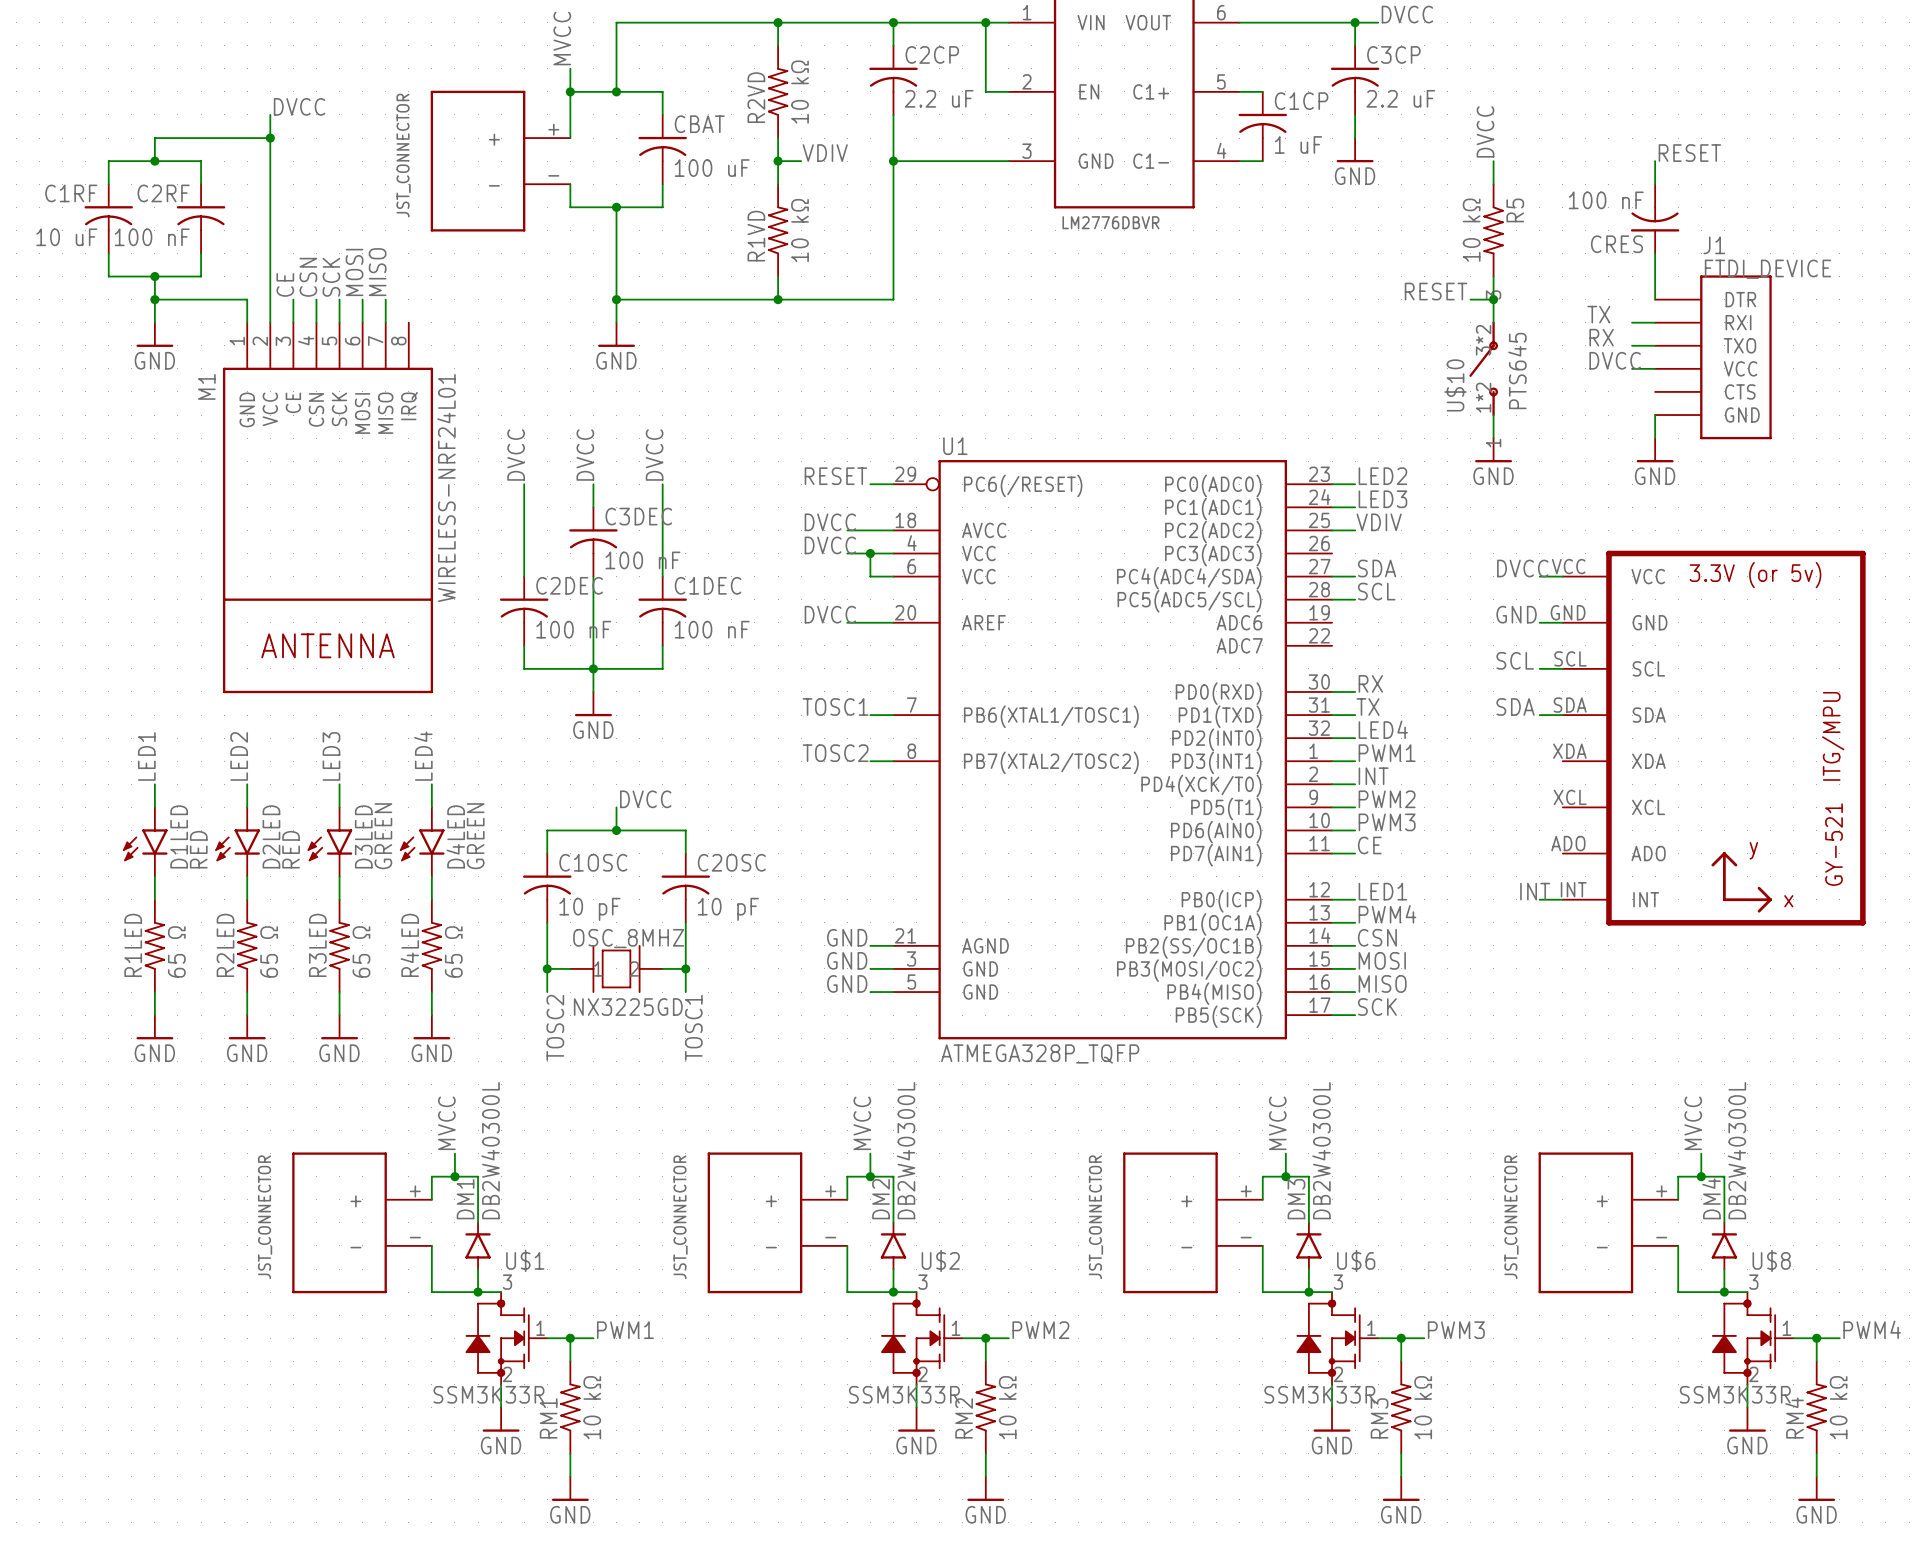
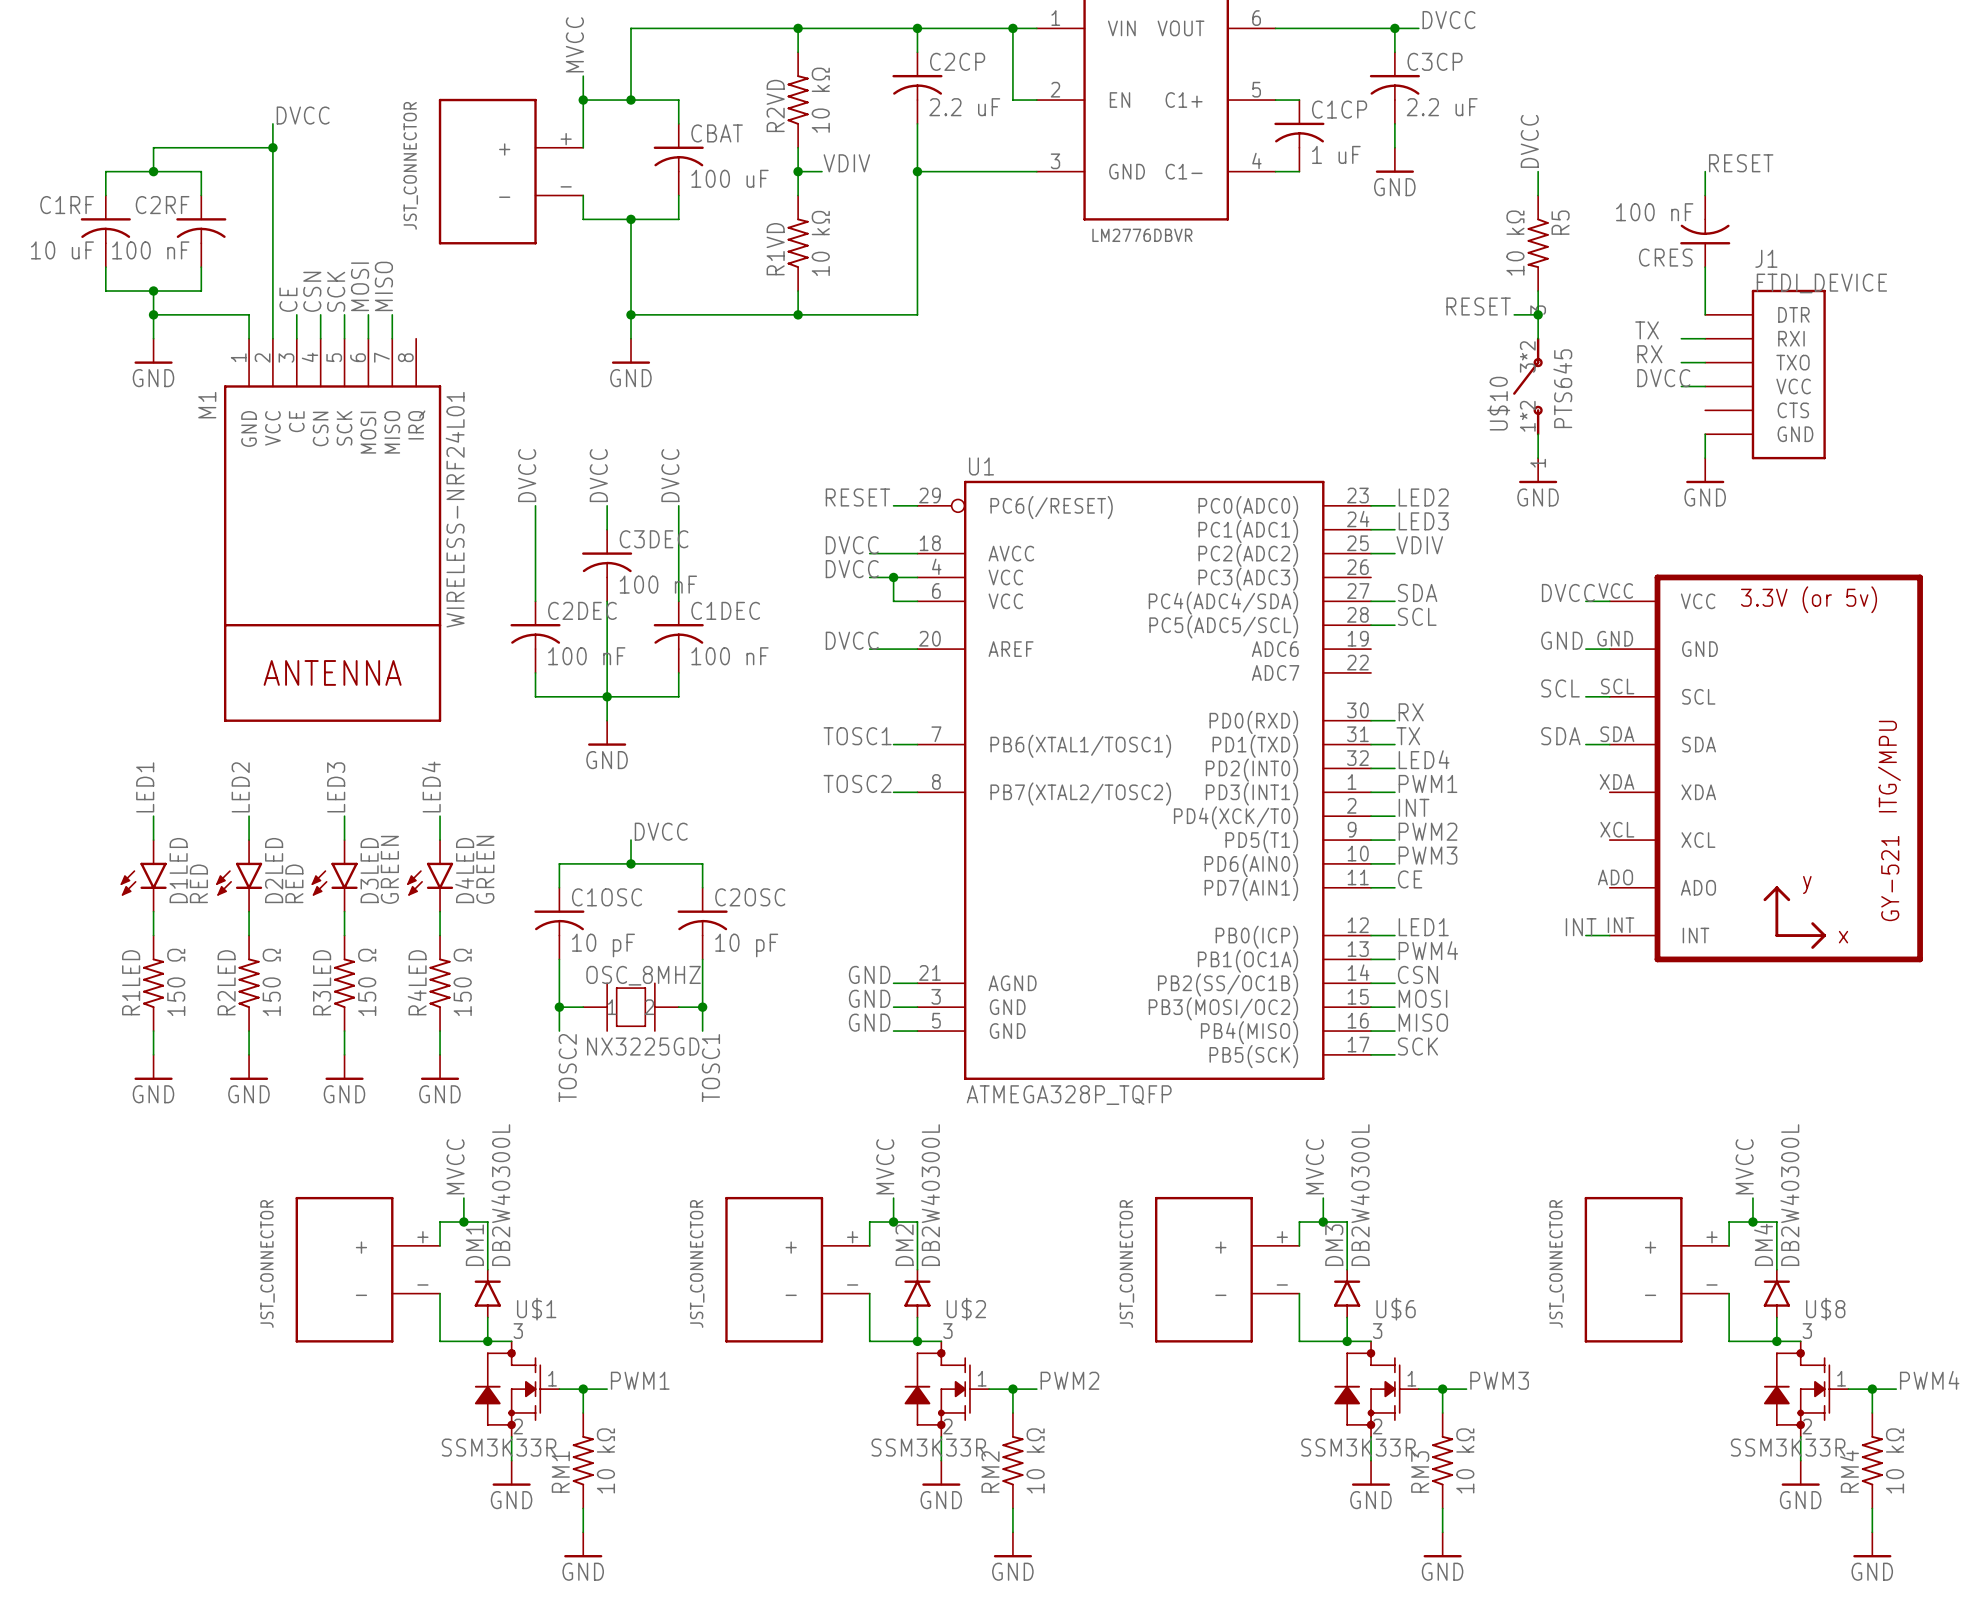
R1LED value: 65 Ω (176, 951) -> 150 Ω (176, 982)
R2LED value: 65 Ω (269, 951) -> 150 Ω (271, 982)
R3LED value: 65 Ω (361, 951) -> 150 Ω (367, 982)
R4LED value: 65 Ω (453, 951) -> 150 Ω (462, 982)

